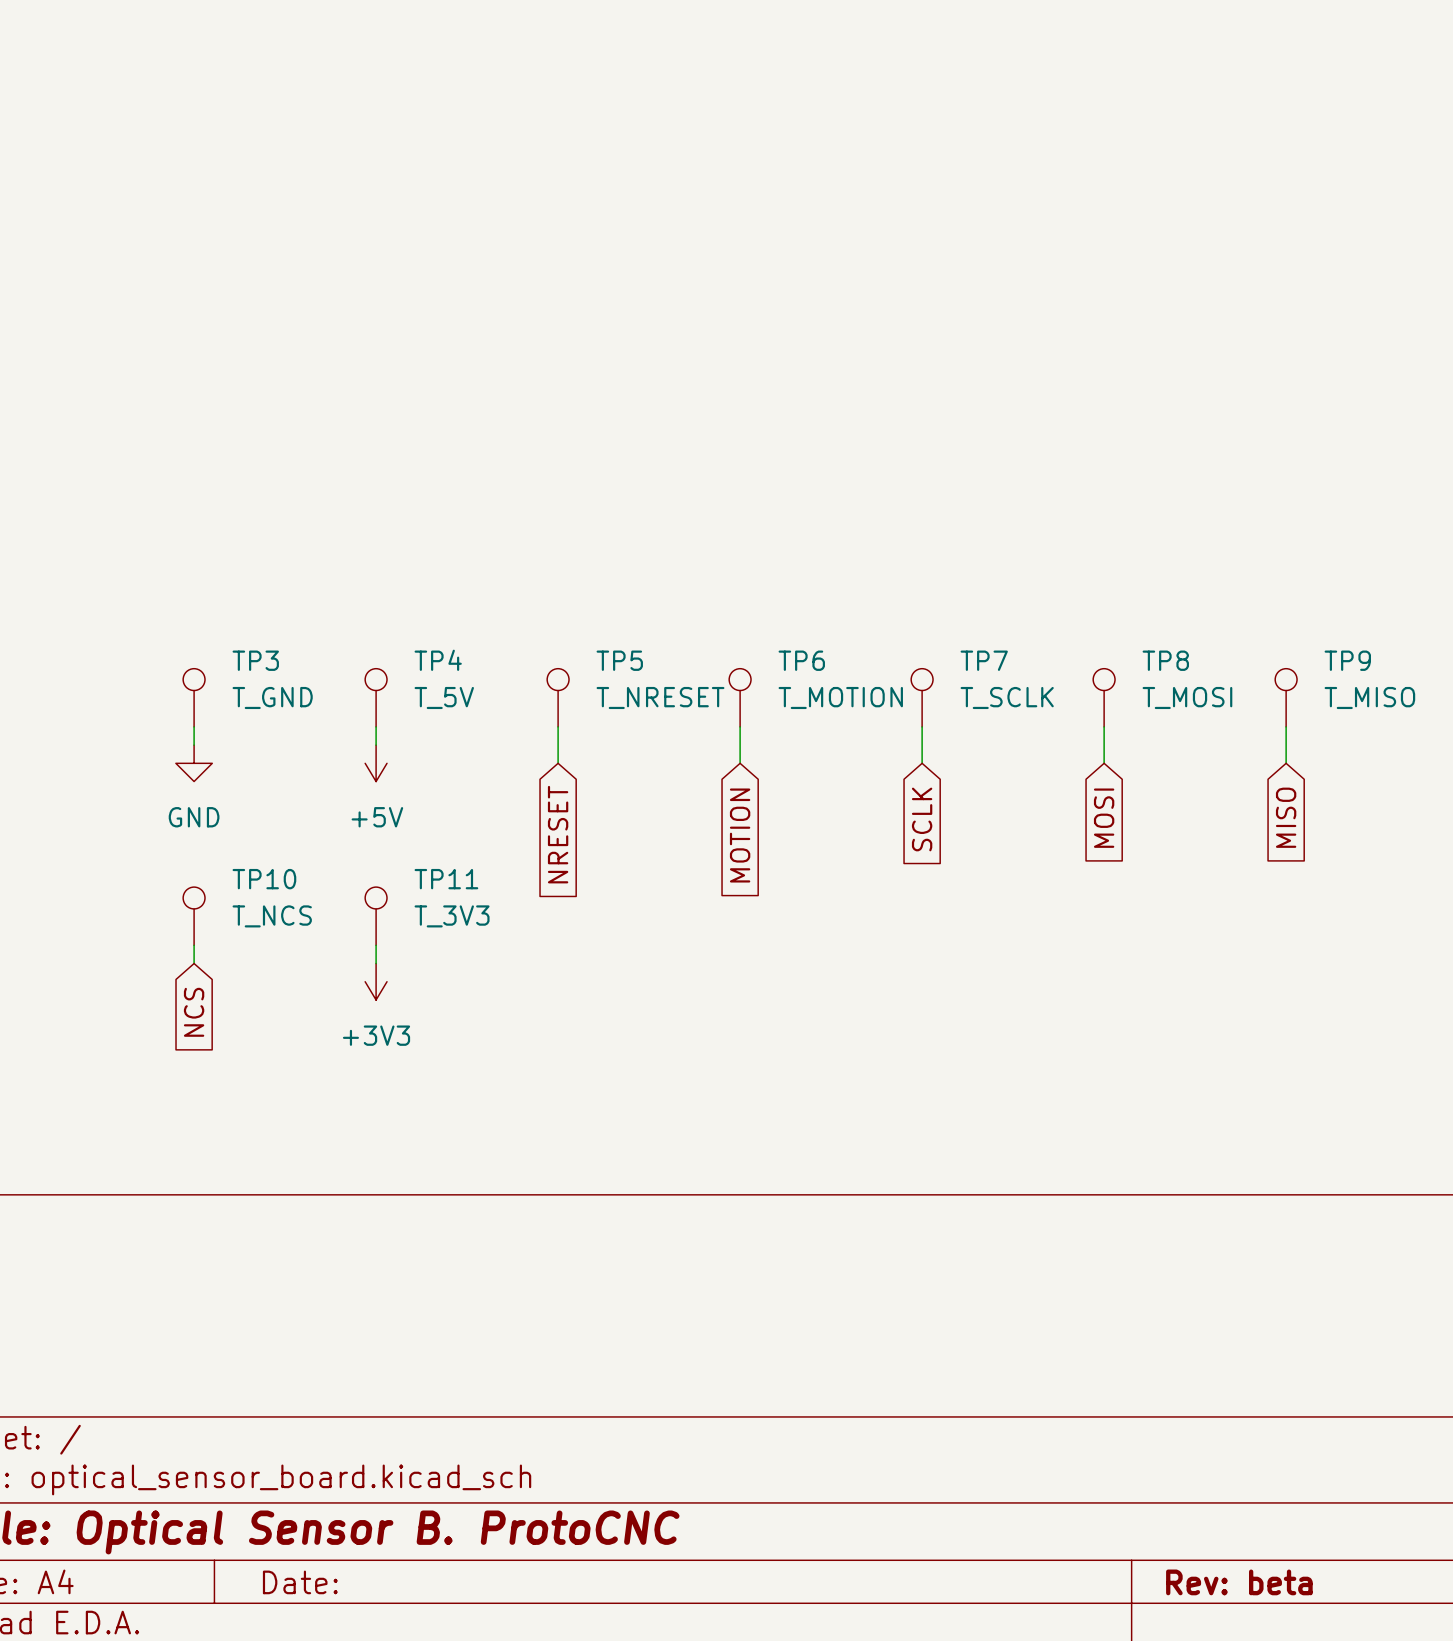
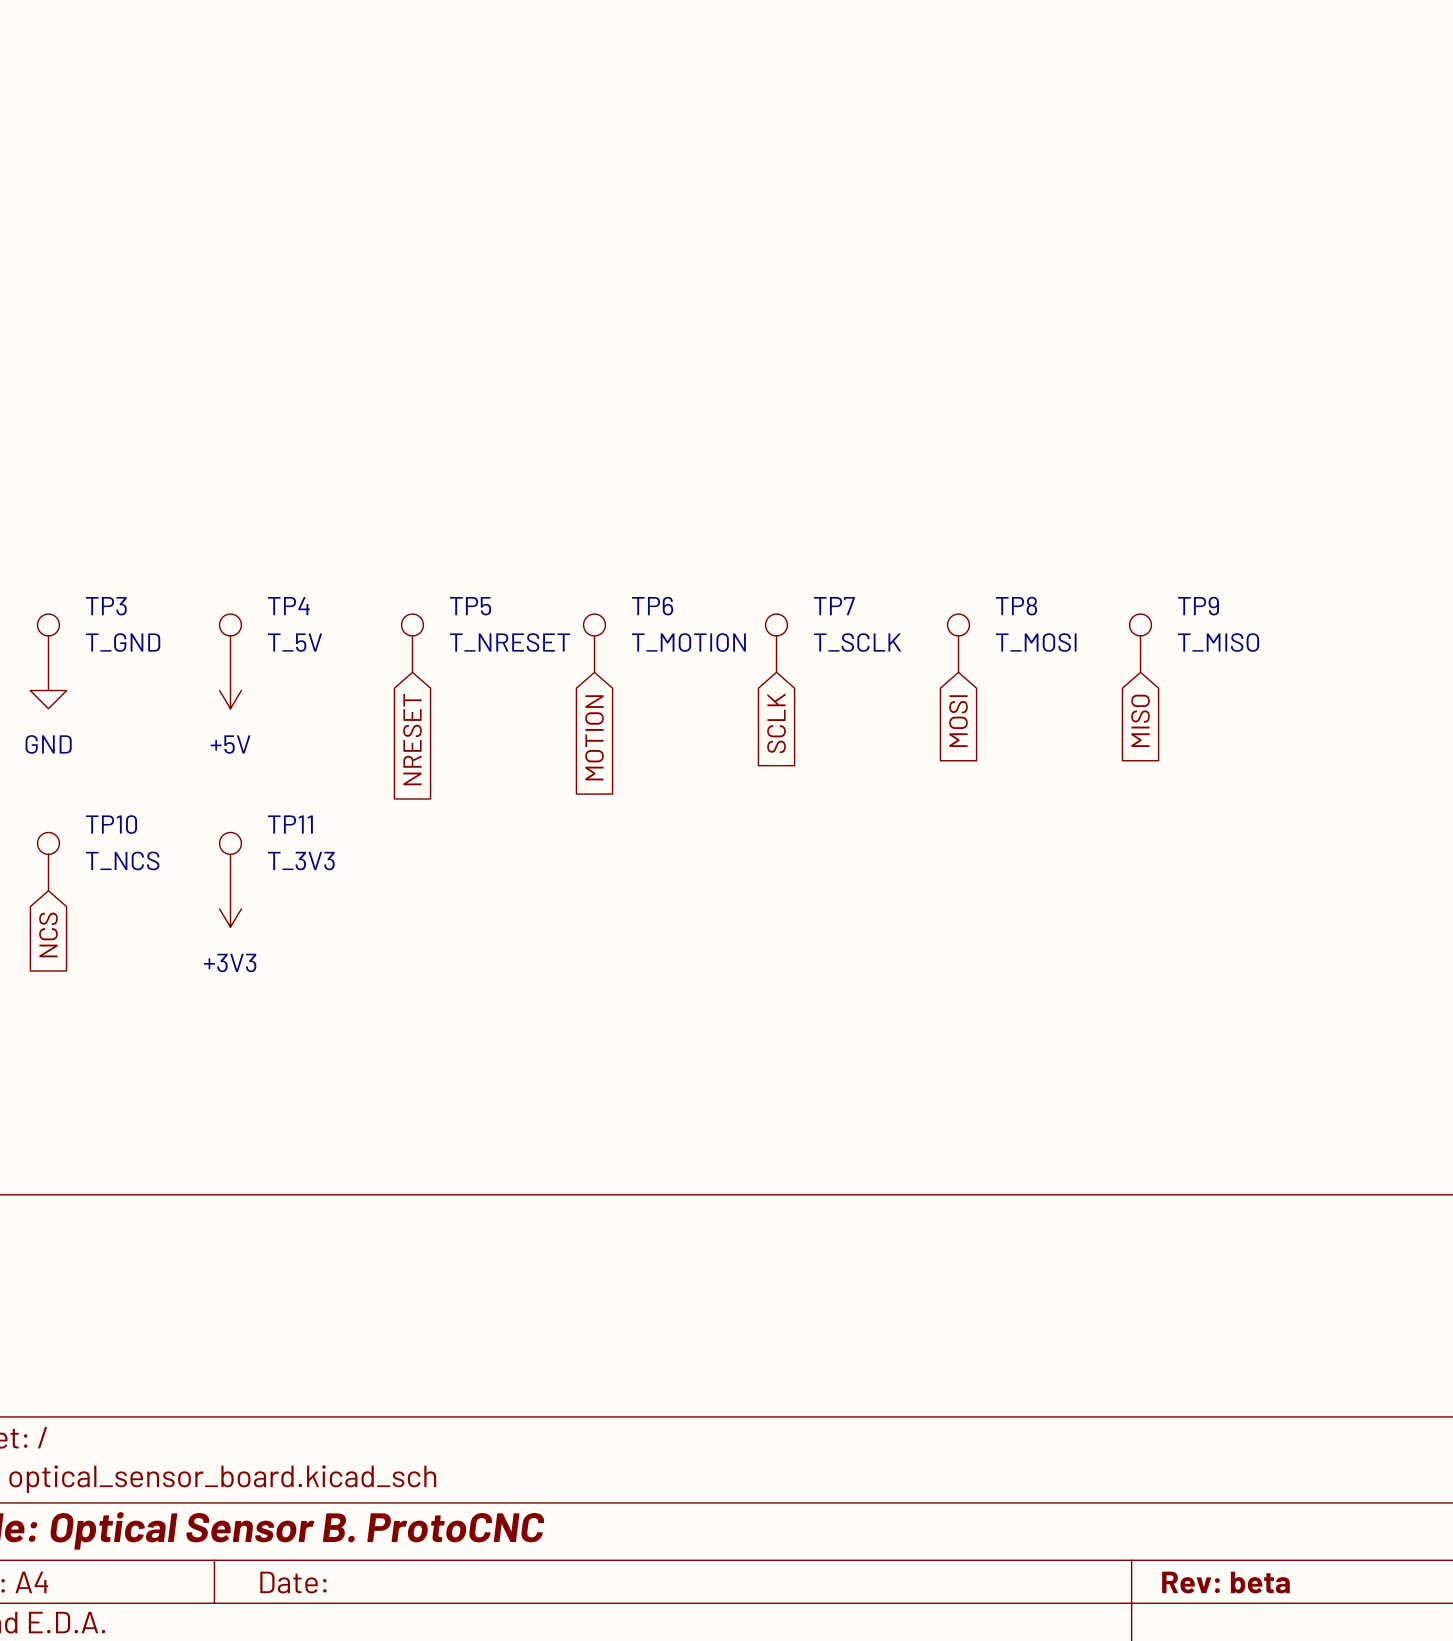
TP3 position: (194, 697) -> (48, 643)
TP4 position: (376, 697) -> (230, 643)
TP5 position: (558, 697) -> (412, 643)
TP6 position: (740, 697) -> (594, 643)
TP7 position: (922, 697) -> (776, 643)
TP8 position: (1104, 697) -> (958, 643)
TP9 position: (1286, 697) -> (1140, 643)
wire: (194, 726) (194, 745) -> none
wire: (376, 726) (376, 745) -> none
wire: (558, 726) (558, 763) -> none
wire: (740, 726) (740, 763) -> none
wire: (922, 726) (922, 763) -> none
wire: (1104, 726) (1104, 763) -> none
wire: (1286, 726) (1286, 763) -> none
power symbol position: GND (194, 763) -> GND (48, 690)
power symbol position: +5V (376, 763) -> +5V (230, 690)
global label position: MISO (1286, 817) -> MISO (1140, 720)
global label position: MOSI (1104, 818) -> MOSI (958, 721)
global label position: SCLK (922, 819) -> SCLK (776, 723)
global label position: NRESET (558, 834) -> NRESET (412, 739)
global label position: MOTION (740, 835) -> MOTION (594, 737)
TP10 position: (194, 916) -> (48, 861)
TP11 position: (376, 916) -> (230, 861)
wire: (194, 945) (194, 963) -> none
wire: (376, 945) (376, 963) -> none
power symbol position: +3V3 (376, 981) -> +3V3 (230, 908)
global label position: NCS (194, 1012) -> NCS (48, 934)

